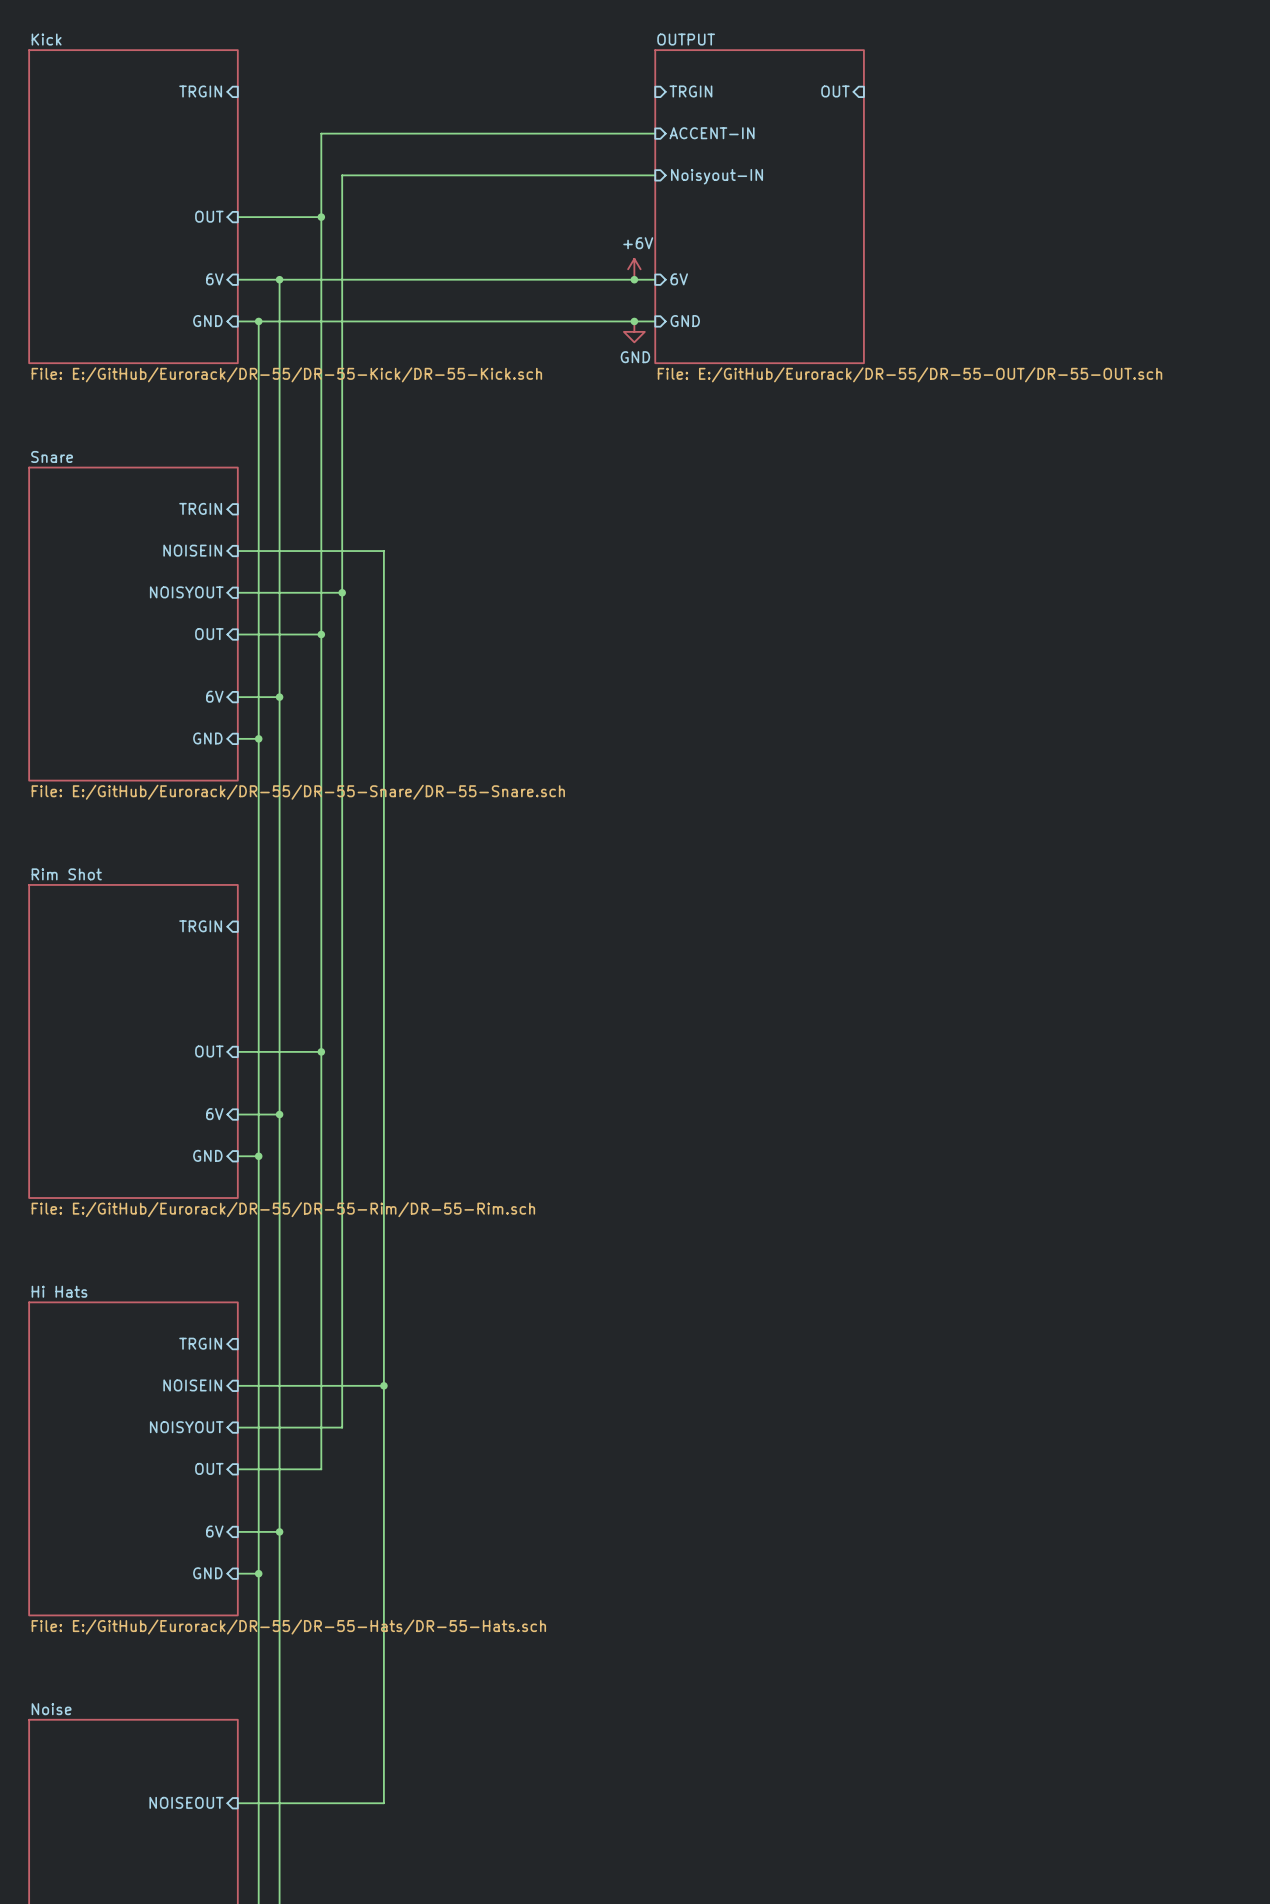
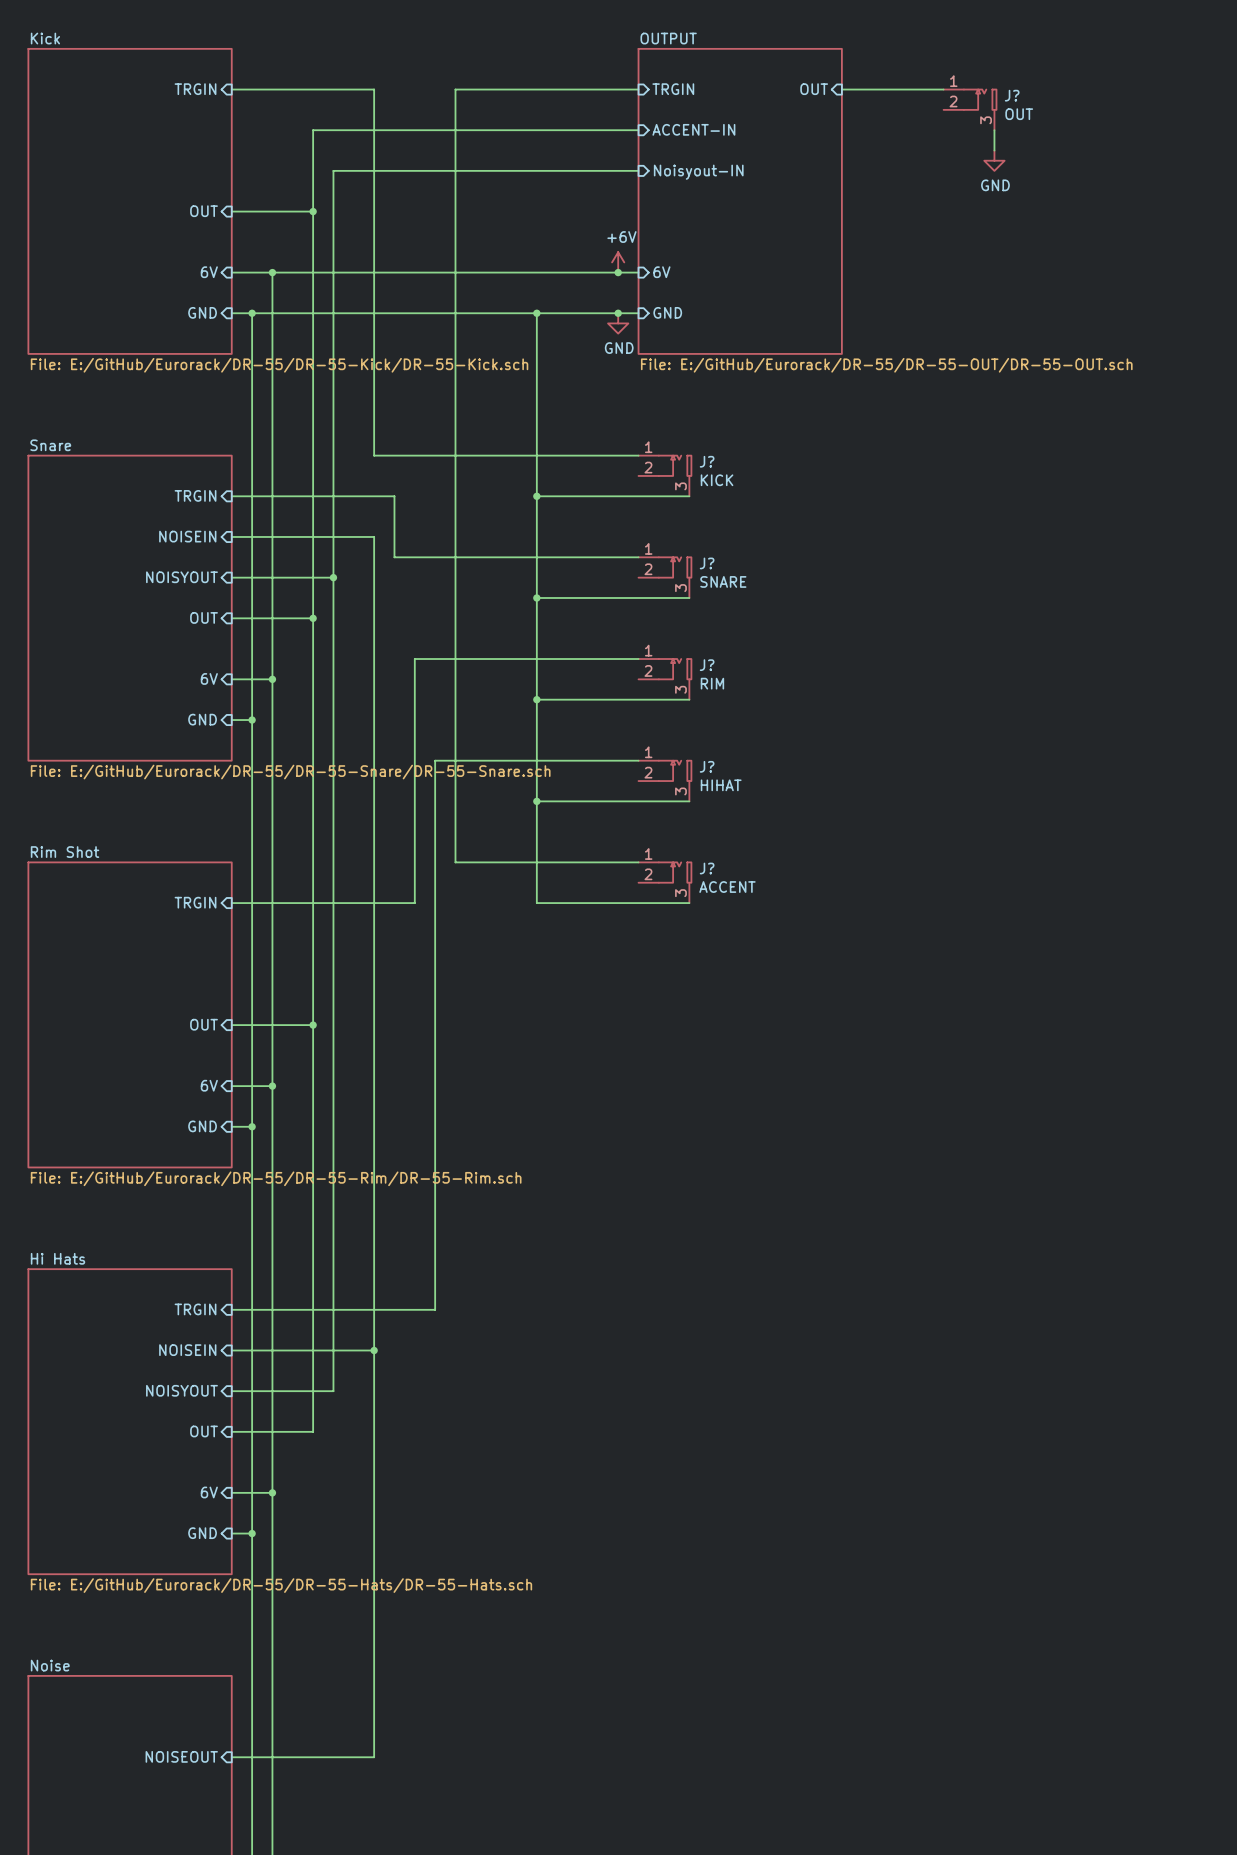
wire: none -> (231, 89) (374, 89) (374, 455) (638, 455)
wire: none -> (638, 89) (455, 89) (455, 862) (638, 862)
wire: none -> (841, 89) (943, 89)
J?: none -> OUT (970, 109)
wire: none -> (994, 130) (994, 150)
power symbol: none -> GND (994, 160)
wire: none -> (536, 313) (536, 903) (689, 903)
junction: none -> (536, 313)
J?: none -> KICK (664, 475)
wire: none -> (231, 496) (394, 496) (394, 557) (638, 557)
wire: none -> (536, 496) (689, 496)
junction: none -> (536, 496)
J?: none -> SNARE (664, 577)
wire: none -> (536, 597) (689, 597)
junction: none -> (536, 597)
wire: none -> (638, 659) (414, 659) (414, 903) (231, 903)
J?: none -> RIM (664, 679)
wire: none -> (536, 699) (689, 699)
junction: none -> (536, 699)
wire: none -> (638, 760) (435, 760) (435, 1309) (231, 1309)
J?: none -> HIHAT (664, 781)
wire: none -> (536, 801) (689, 801)
junction: none -> (536, 801)
J?: none -> ACCENT (664, 882)

